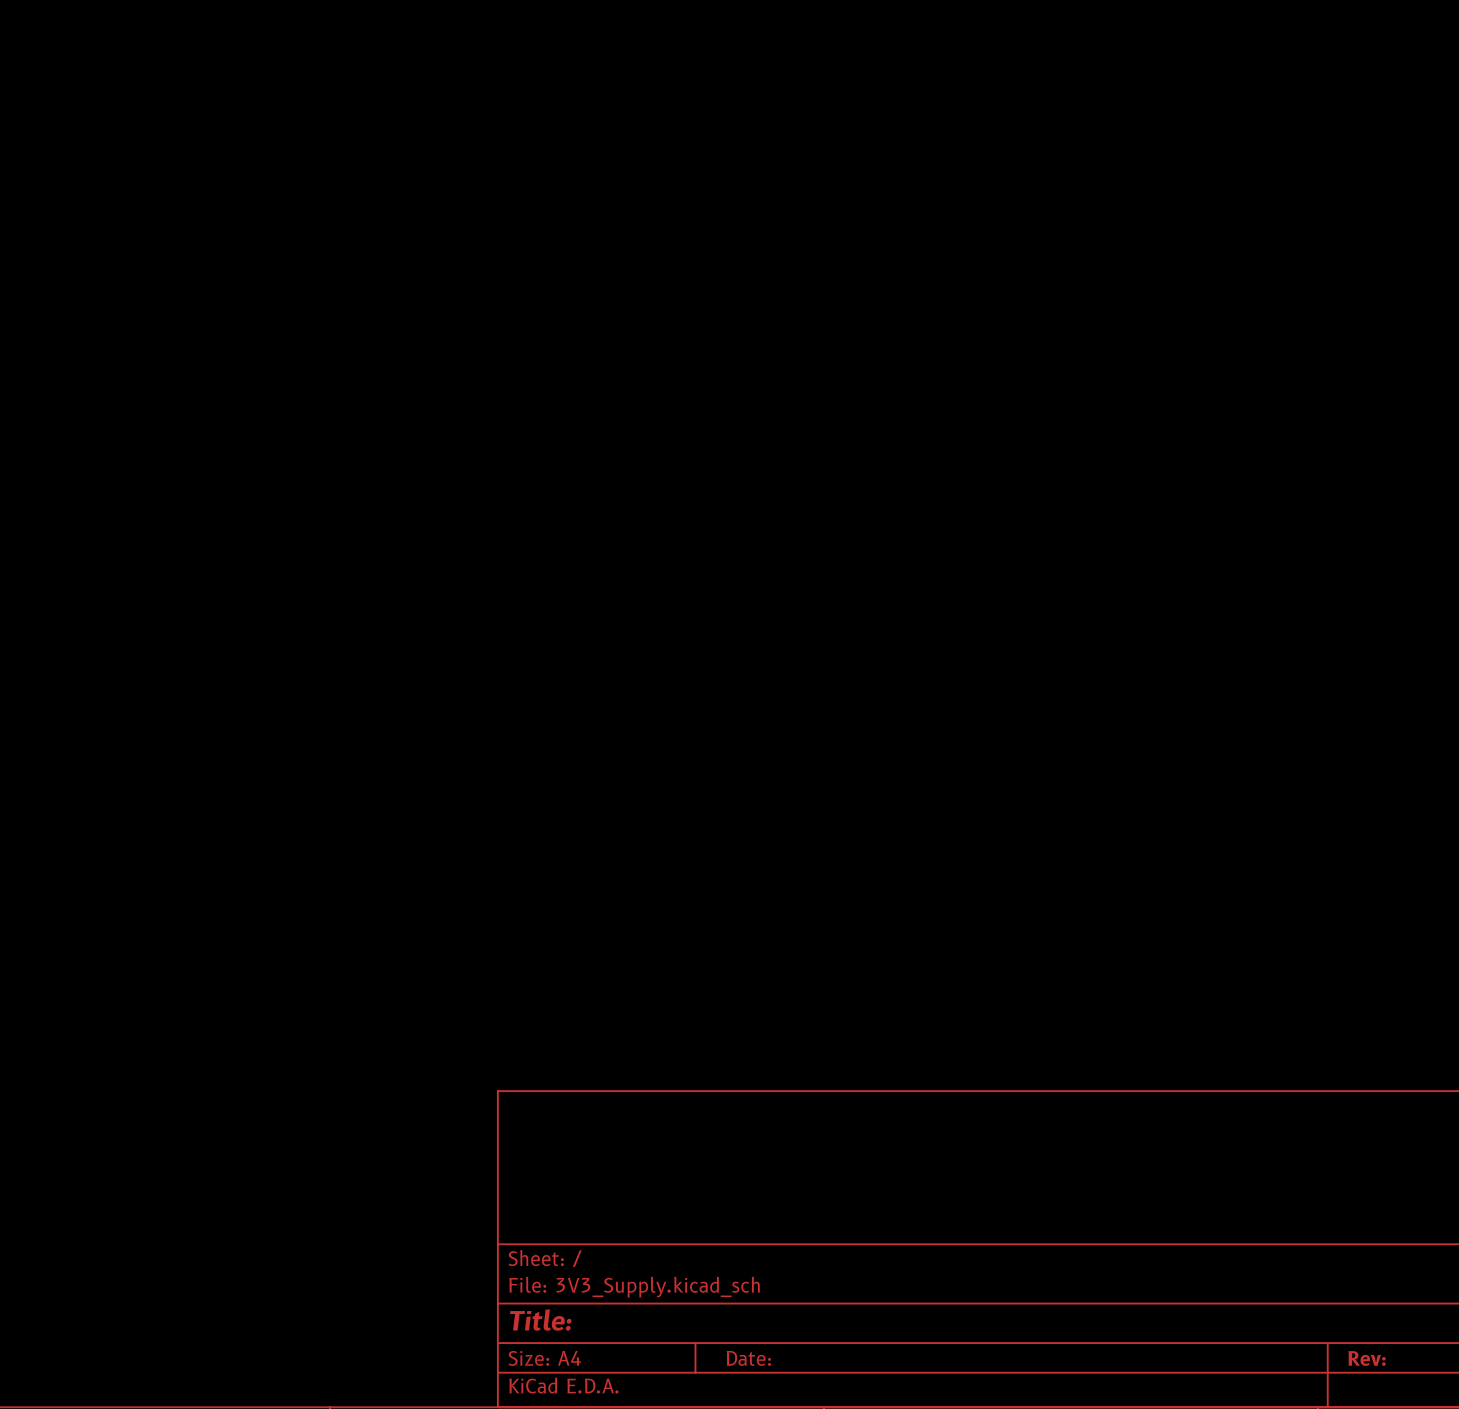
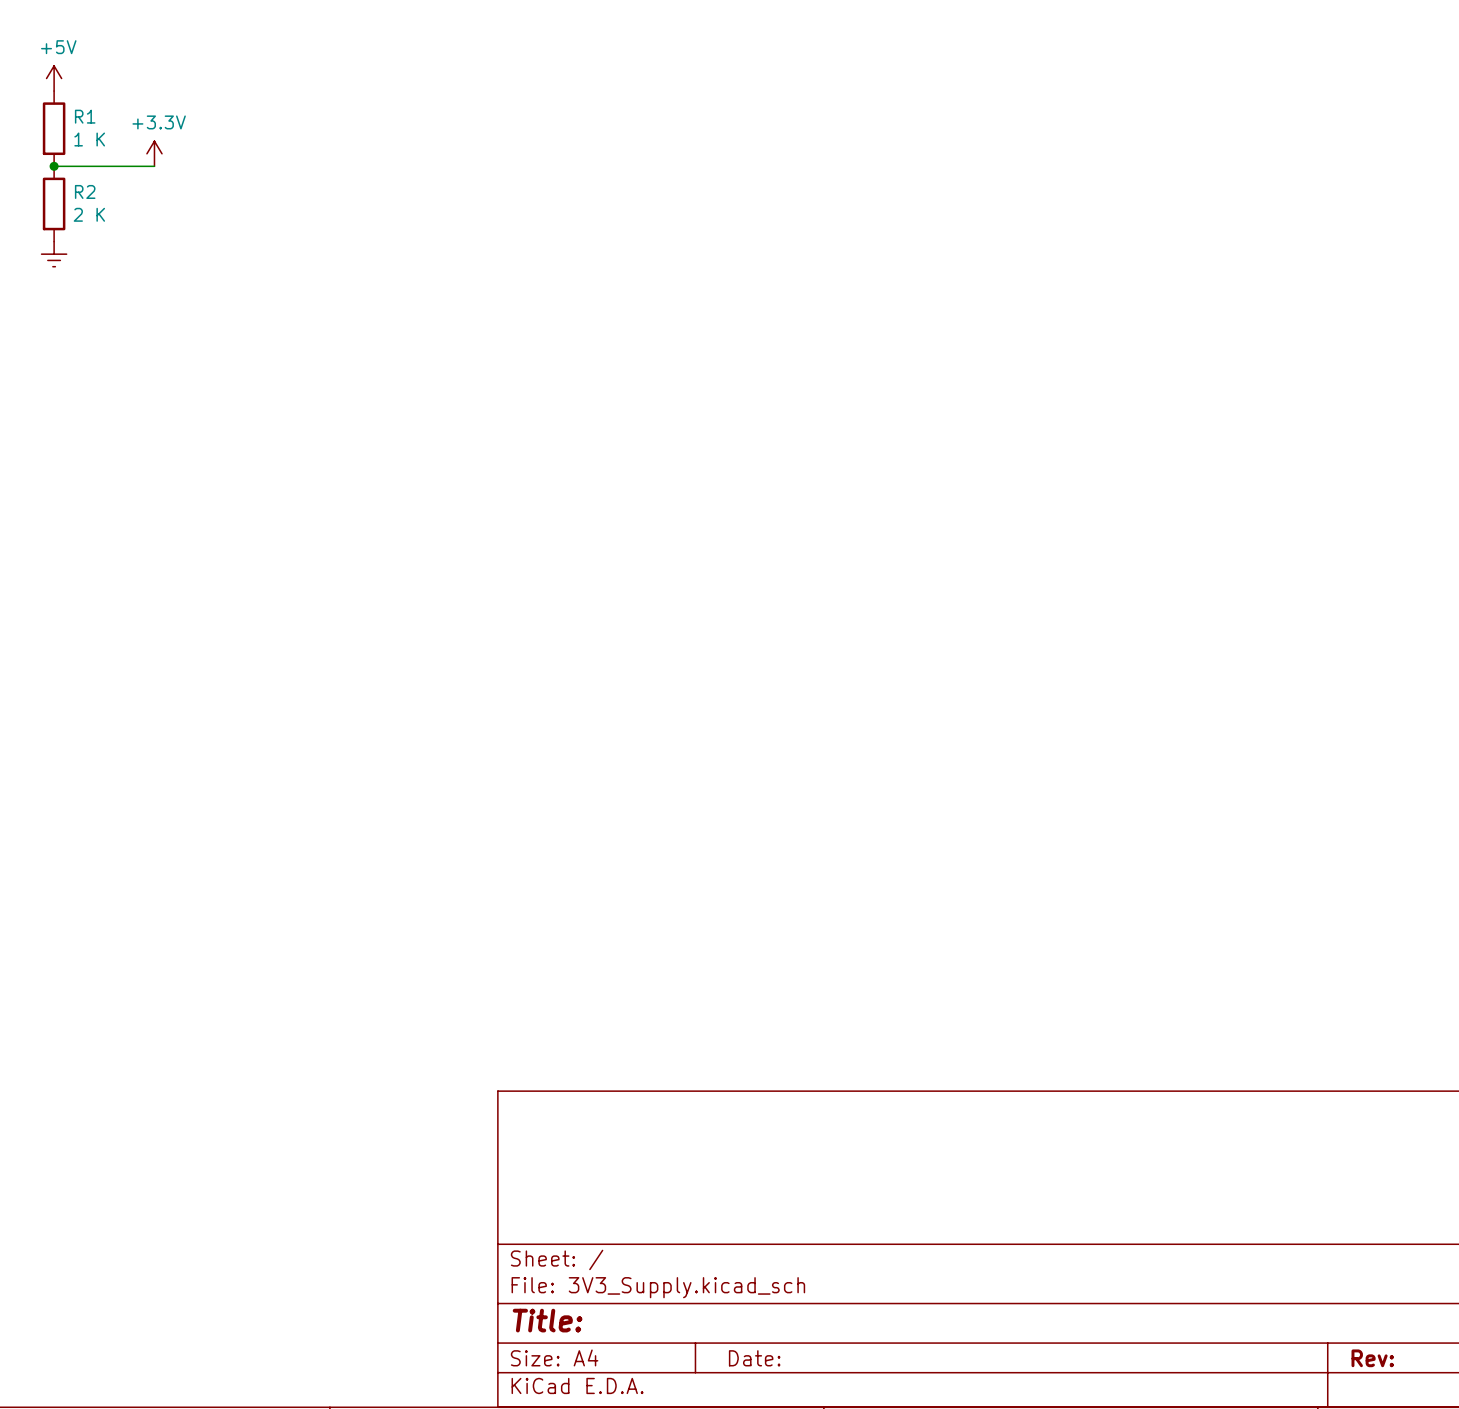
power symbol: none -> +5V (54, 78)
R1: none -> 1 K (54, 128)
power symbol: none -> +3.3V (154, 153)
wire: none -> (54, 166) (154, 166)
junction: none -> (54, 166)
R2: none -> 2 K (54, 203)
power symbol: none -> (54, 254)

